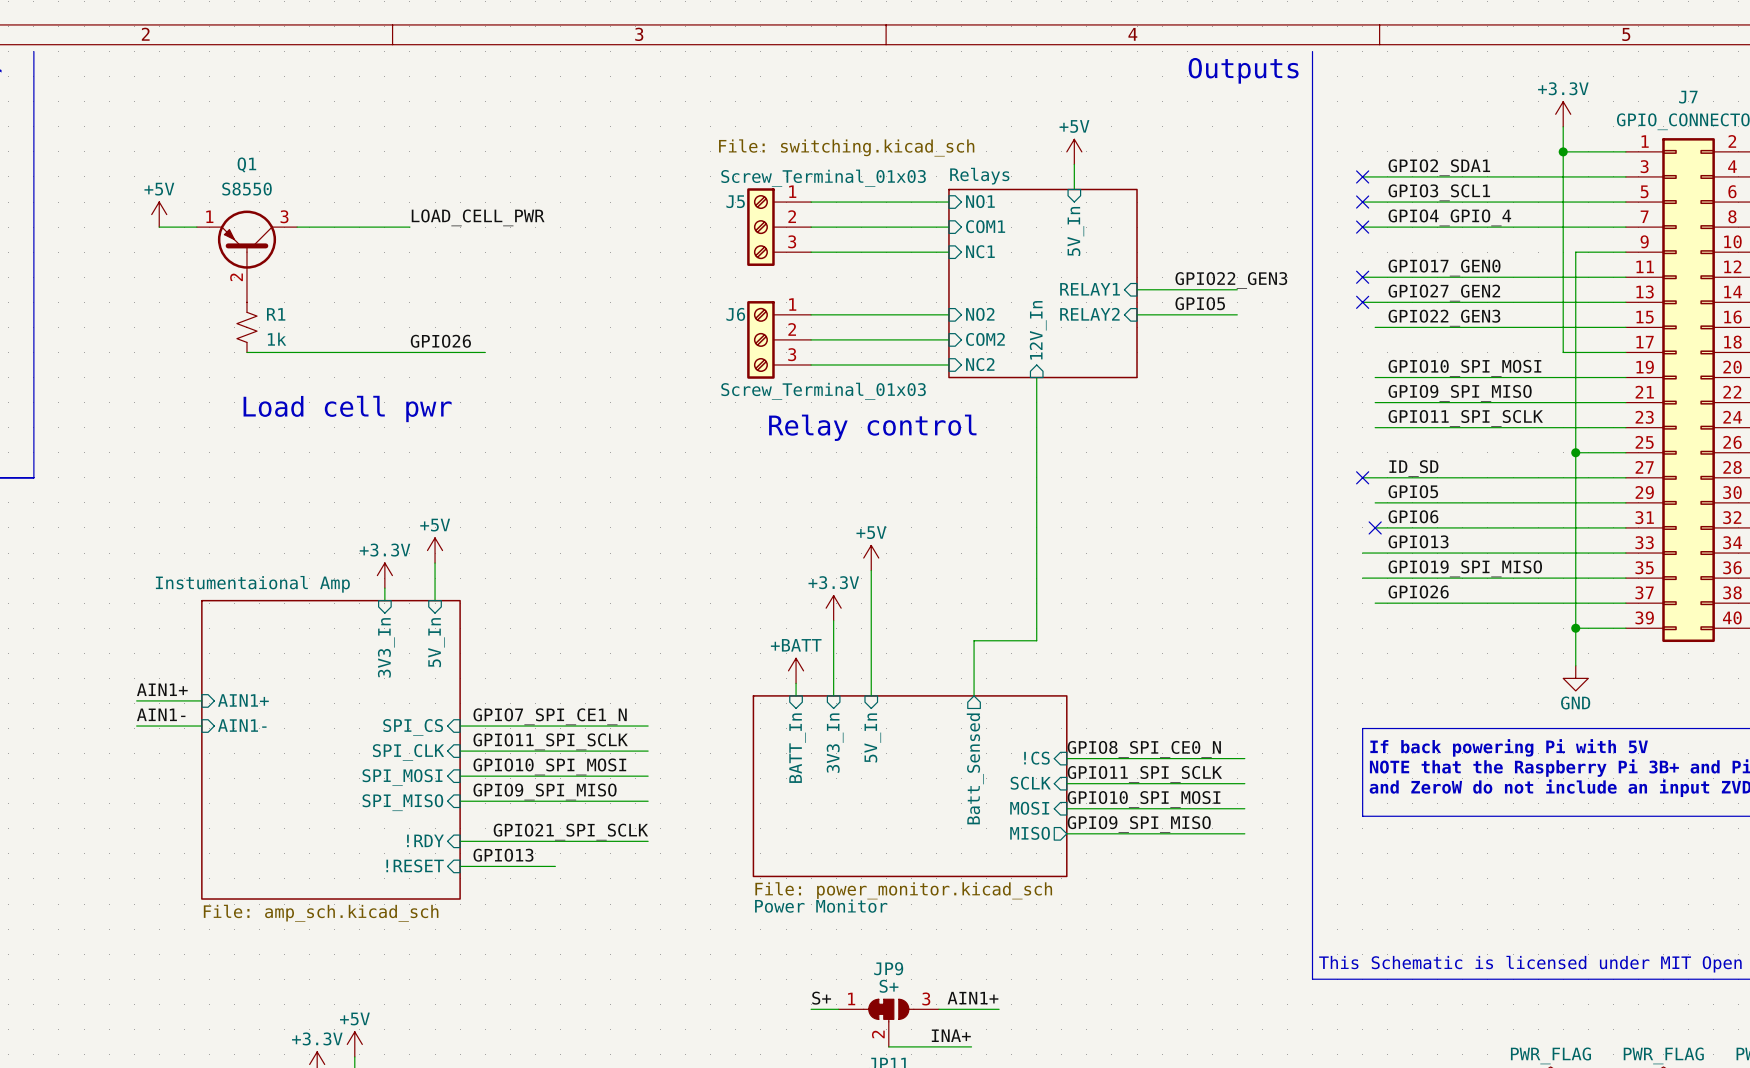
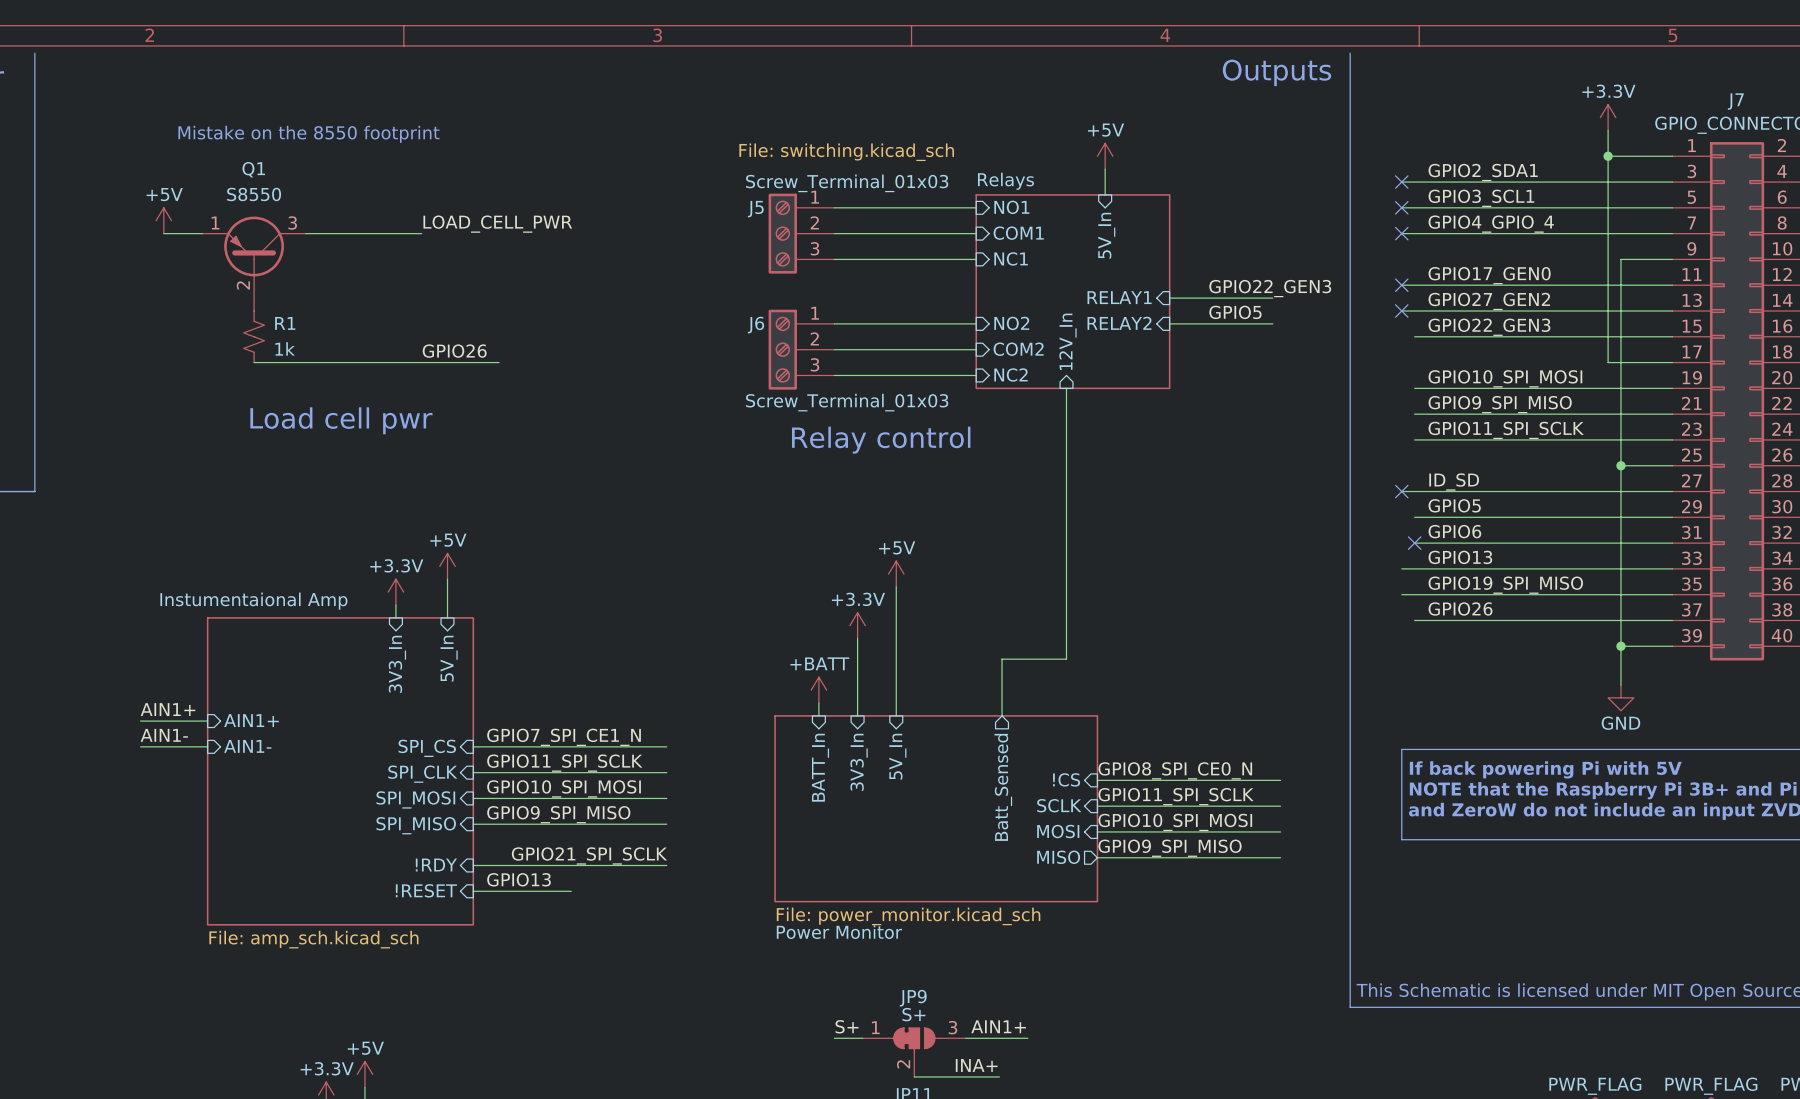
text: none -> Mistake on the 8550 footprint (308, 134)

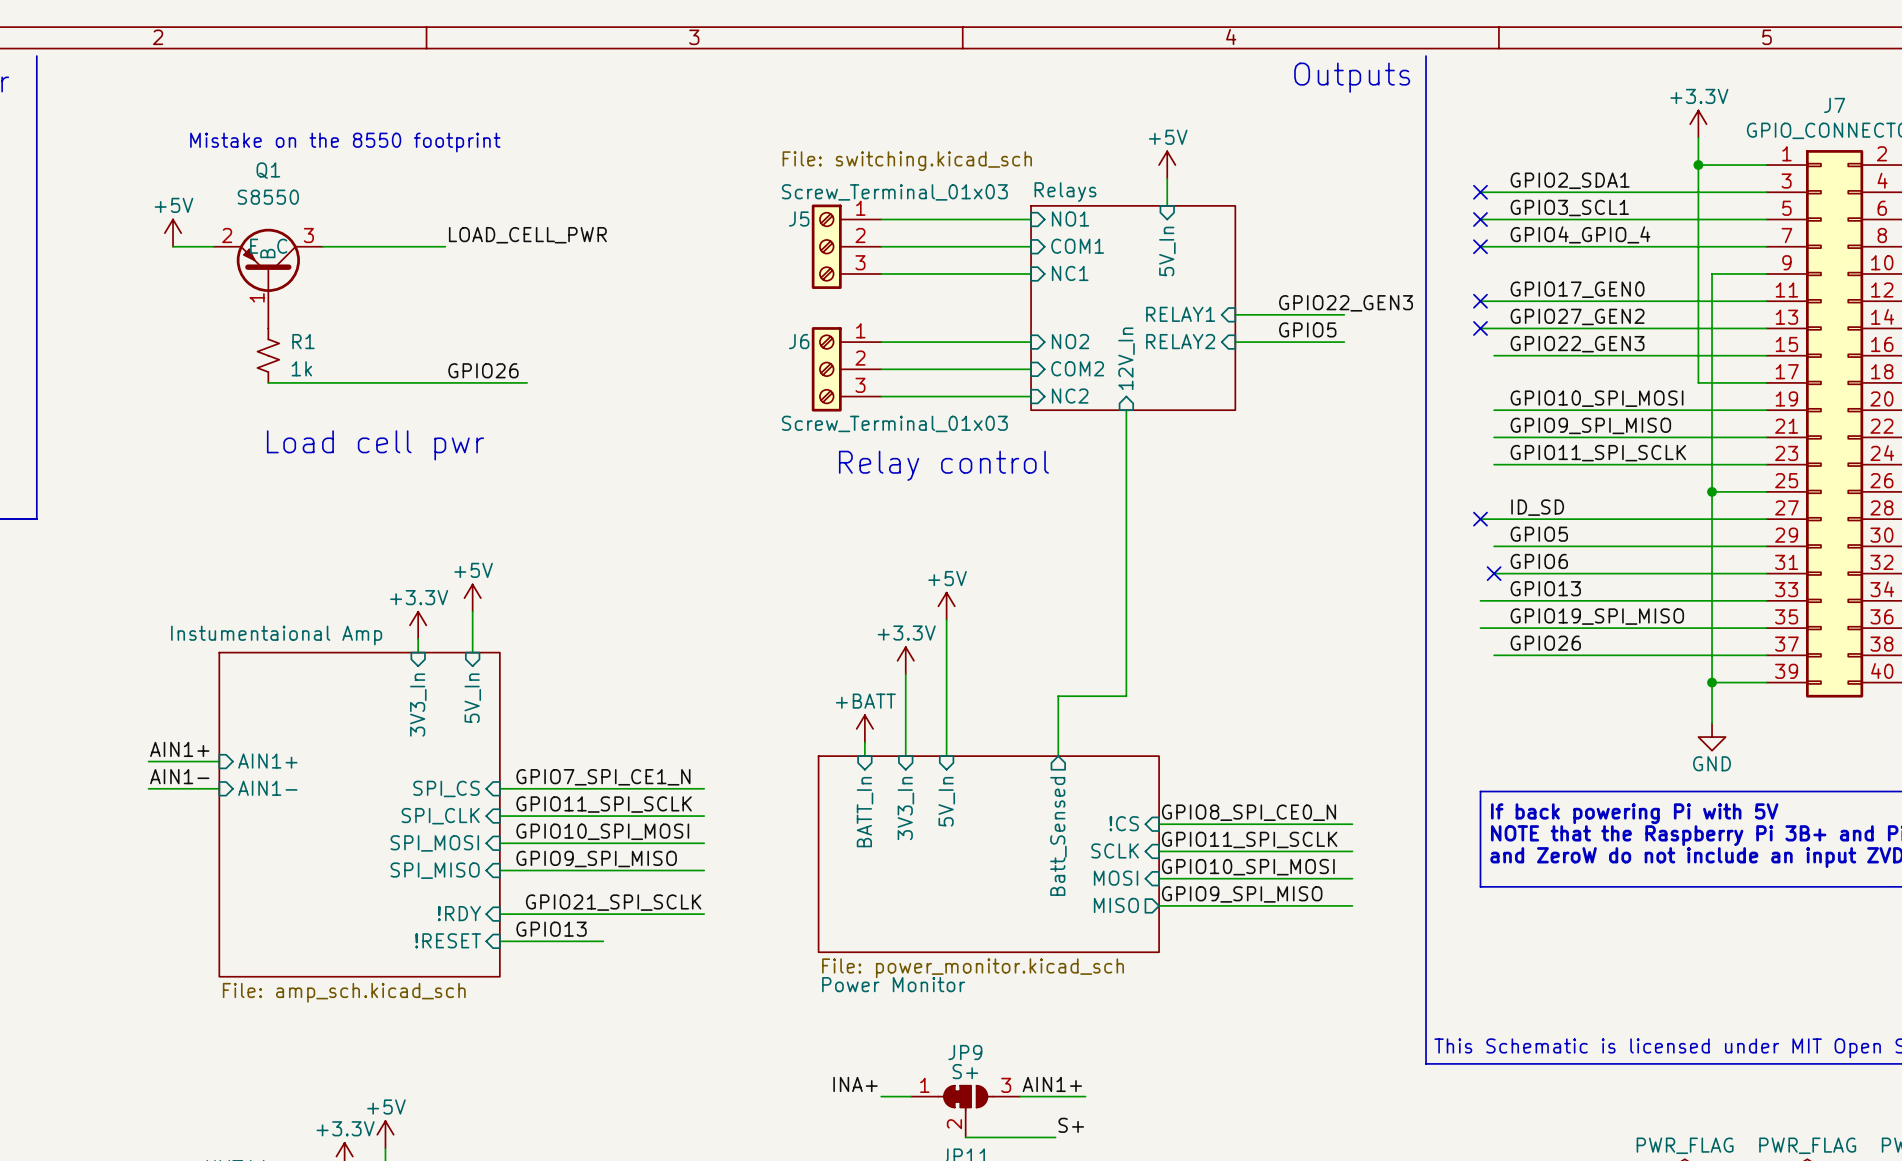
Q1 symbol: [202, 216, 306, 311] -> [213, 228, 323, 329]
label: S+ (847, 1026) -> INA+ (855, 1084)
label: INA+ (976, 1065) -> S+ (1071, 1125)

